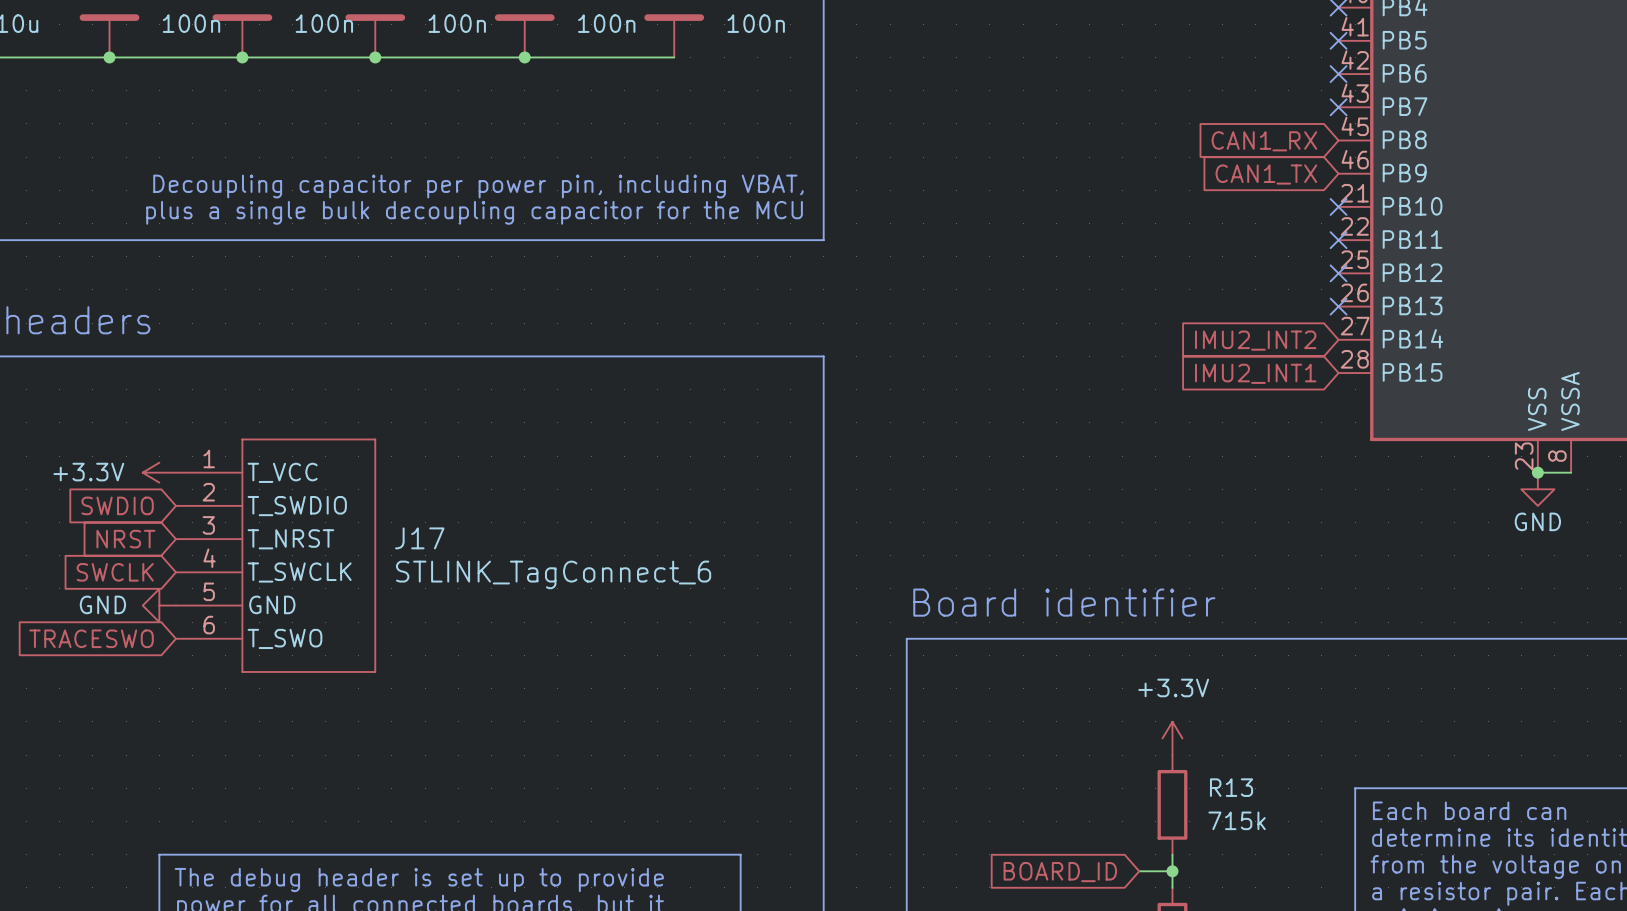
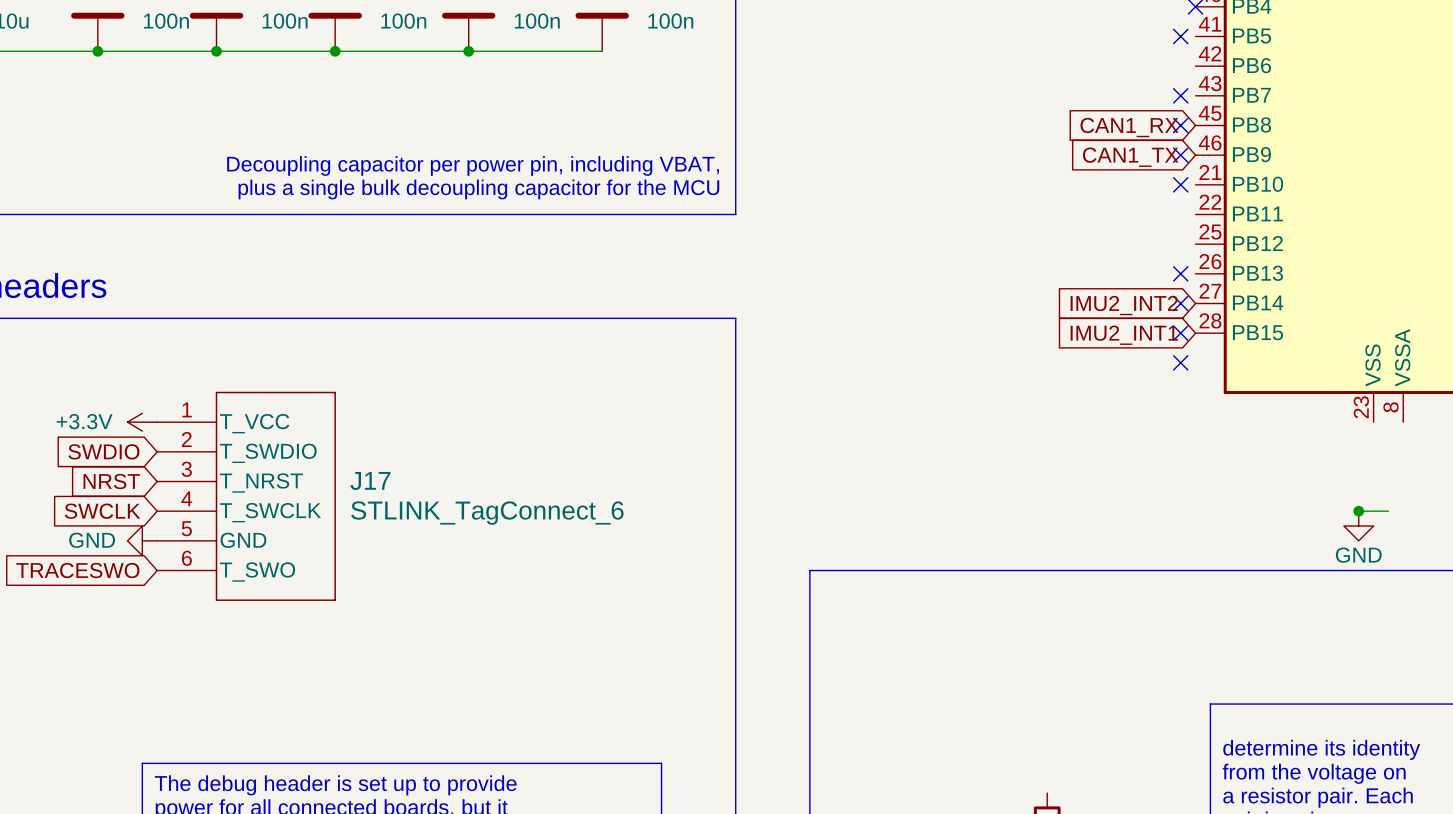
no-connect mark position: (1338, 40) -> (1180, 36)
no-connect mark: (1338, 74) -> none
no-connect mark position: (1338, 107) -> (1180, 95)
no-connect mark: none -> (1180, 125)
no-connect mark: none -> (1180, 155)
no-connect mark position: (1338, 206) -> (1180, 184)
no-connect mark: (1338, 240) -> none
no-connect mark: (1338, 273) -> none
no-connect mark position: (1338, 306) -> (1180, 273)
no-connect mark: none -> (1180, 303)
no-connect mark: none -> (1180, 333)
no-connect mark: none -> (1180, 362)
wire: (1537, 472) (1571, 472) -> (1358, 511) (1388, 511)
junction: (1537, 472) -> none
power symbol position: GND (1537, 489) -> GND (1358, 526)
junction: none -> (1358, 511)
text: Board identifier (1064, 602) -> none
power symbol: +3.3V (1172, 738) -> none
R13: 715k (1172, 804) -> none
text: Each board can (1469, 810) -> none
wire: (1172, 854) (1172, 887) -> none
wire: (1139, 871) (1172, 871) -> none
junction: (1172, 871) -> none
global label: BOARD_ID (1060, 872) -> none

